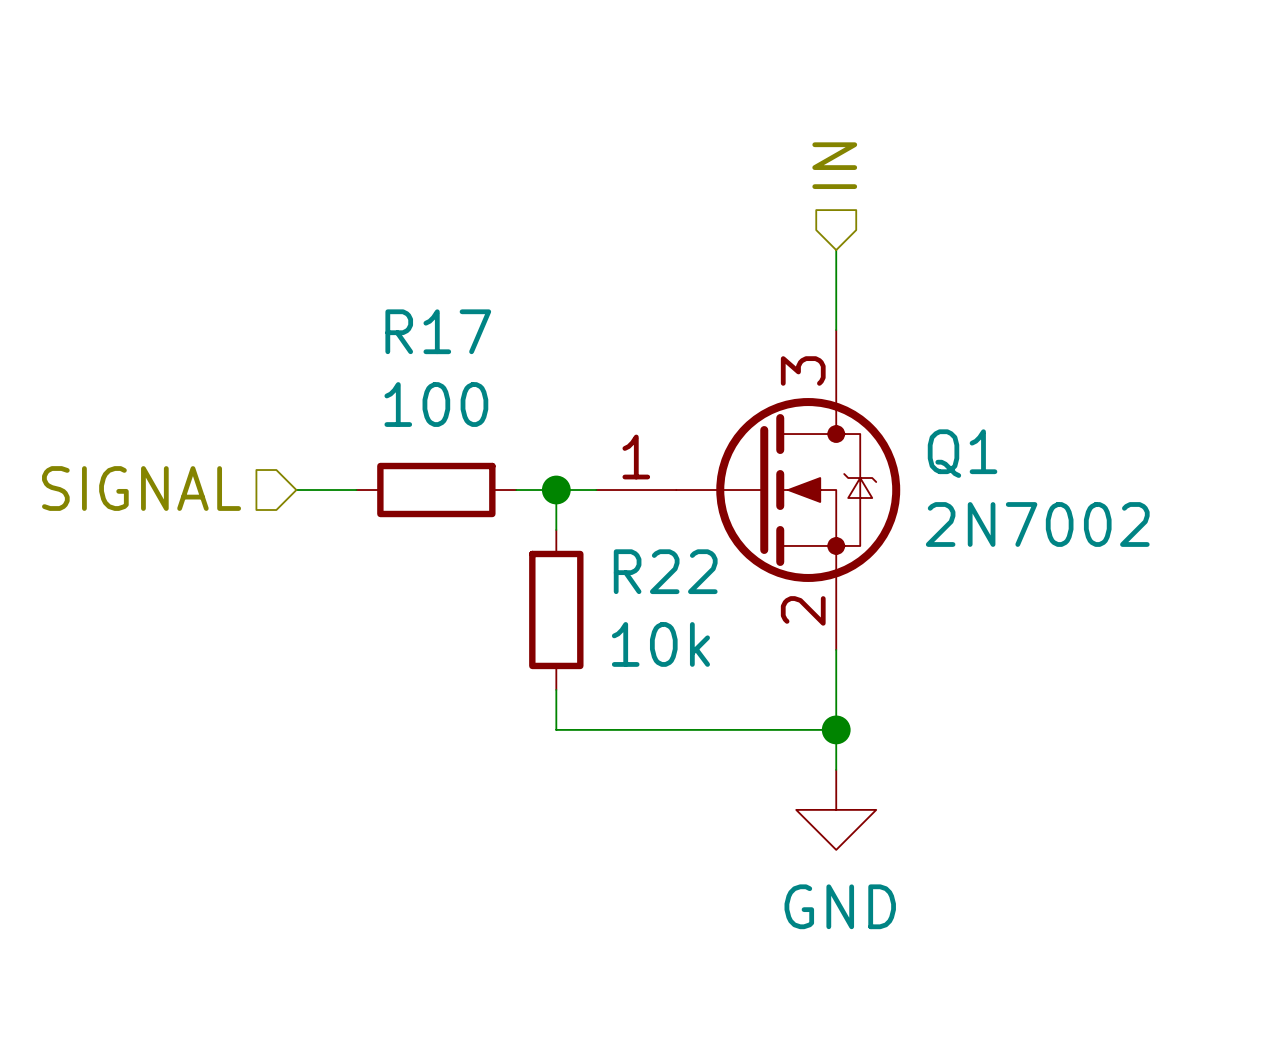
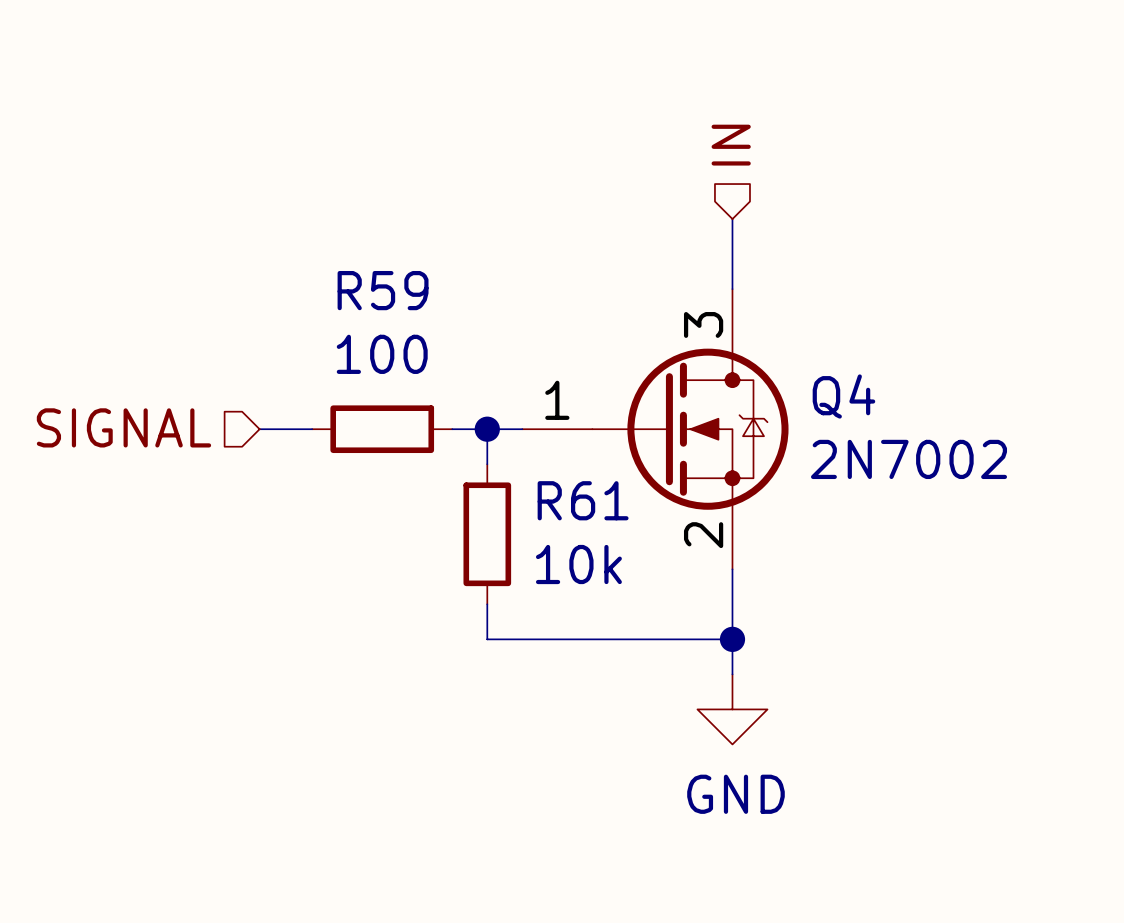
R17 name: R17 (438, 331) -> R59 (383, 290)
Q1 name: Q1 (962, 453) -> Q4 (843, 396)
R22 name: R22 (665, 571) -> R61 (583, 500)

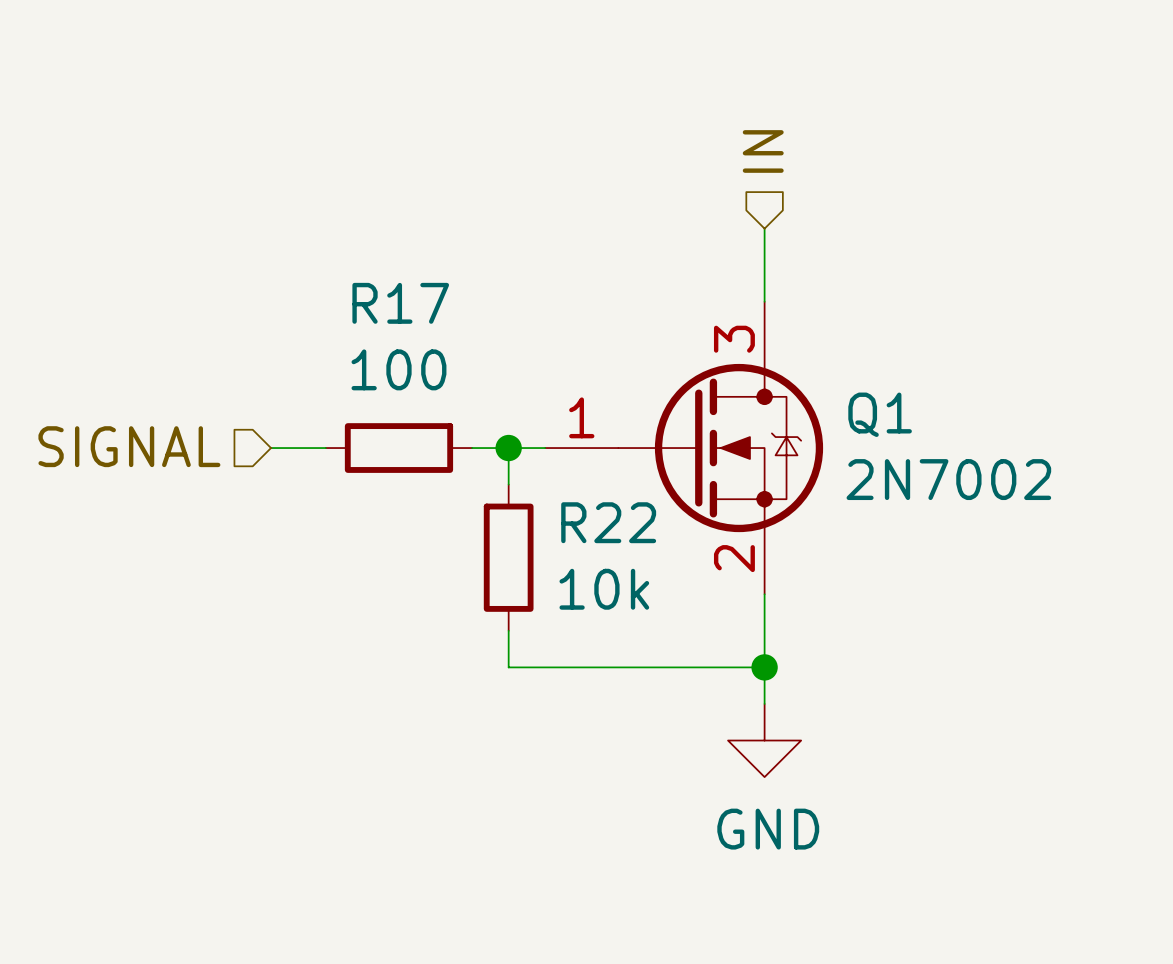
R59 name: R59 (383, 290) -> R17 (400, 303)
Q4 name: Q4 (843, 396) -> Q1 (880, 414)
R61 name: R61 (583, 500) -> R22 (608, 522)

